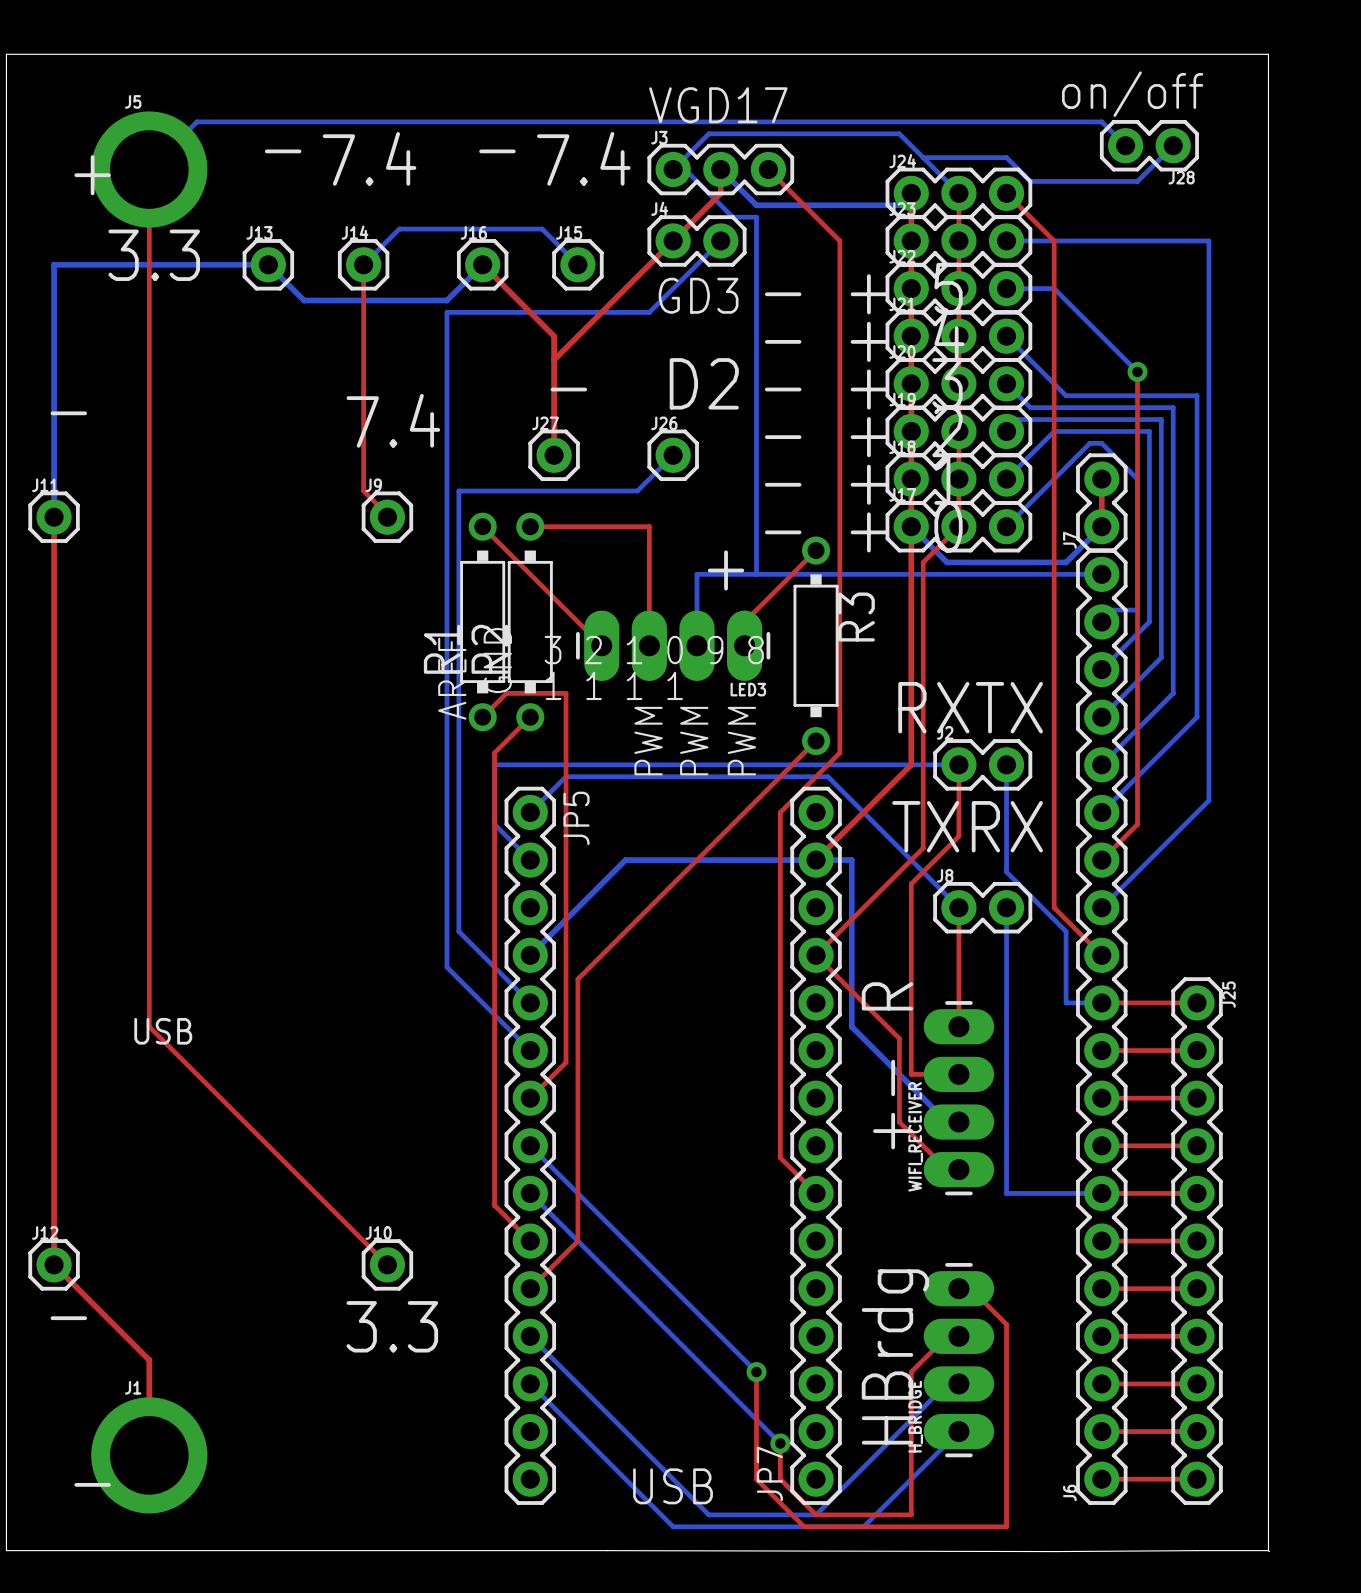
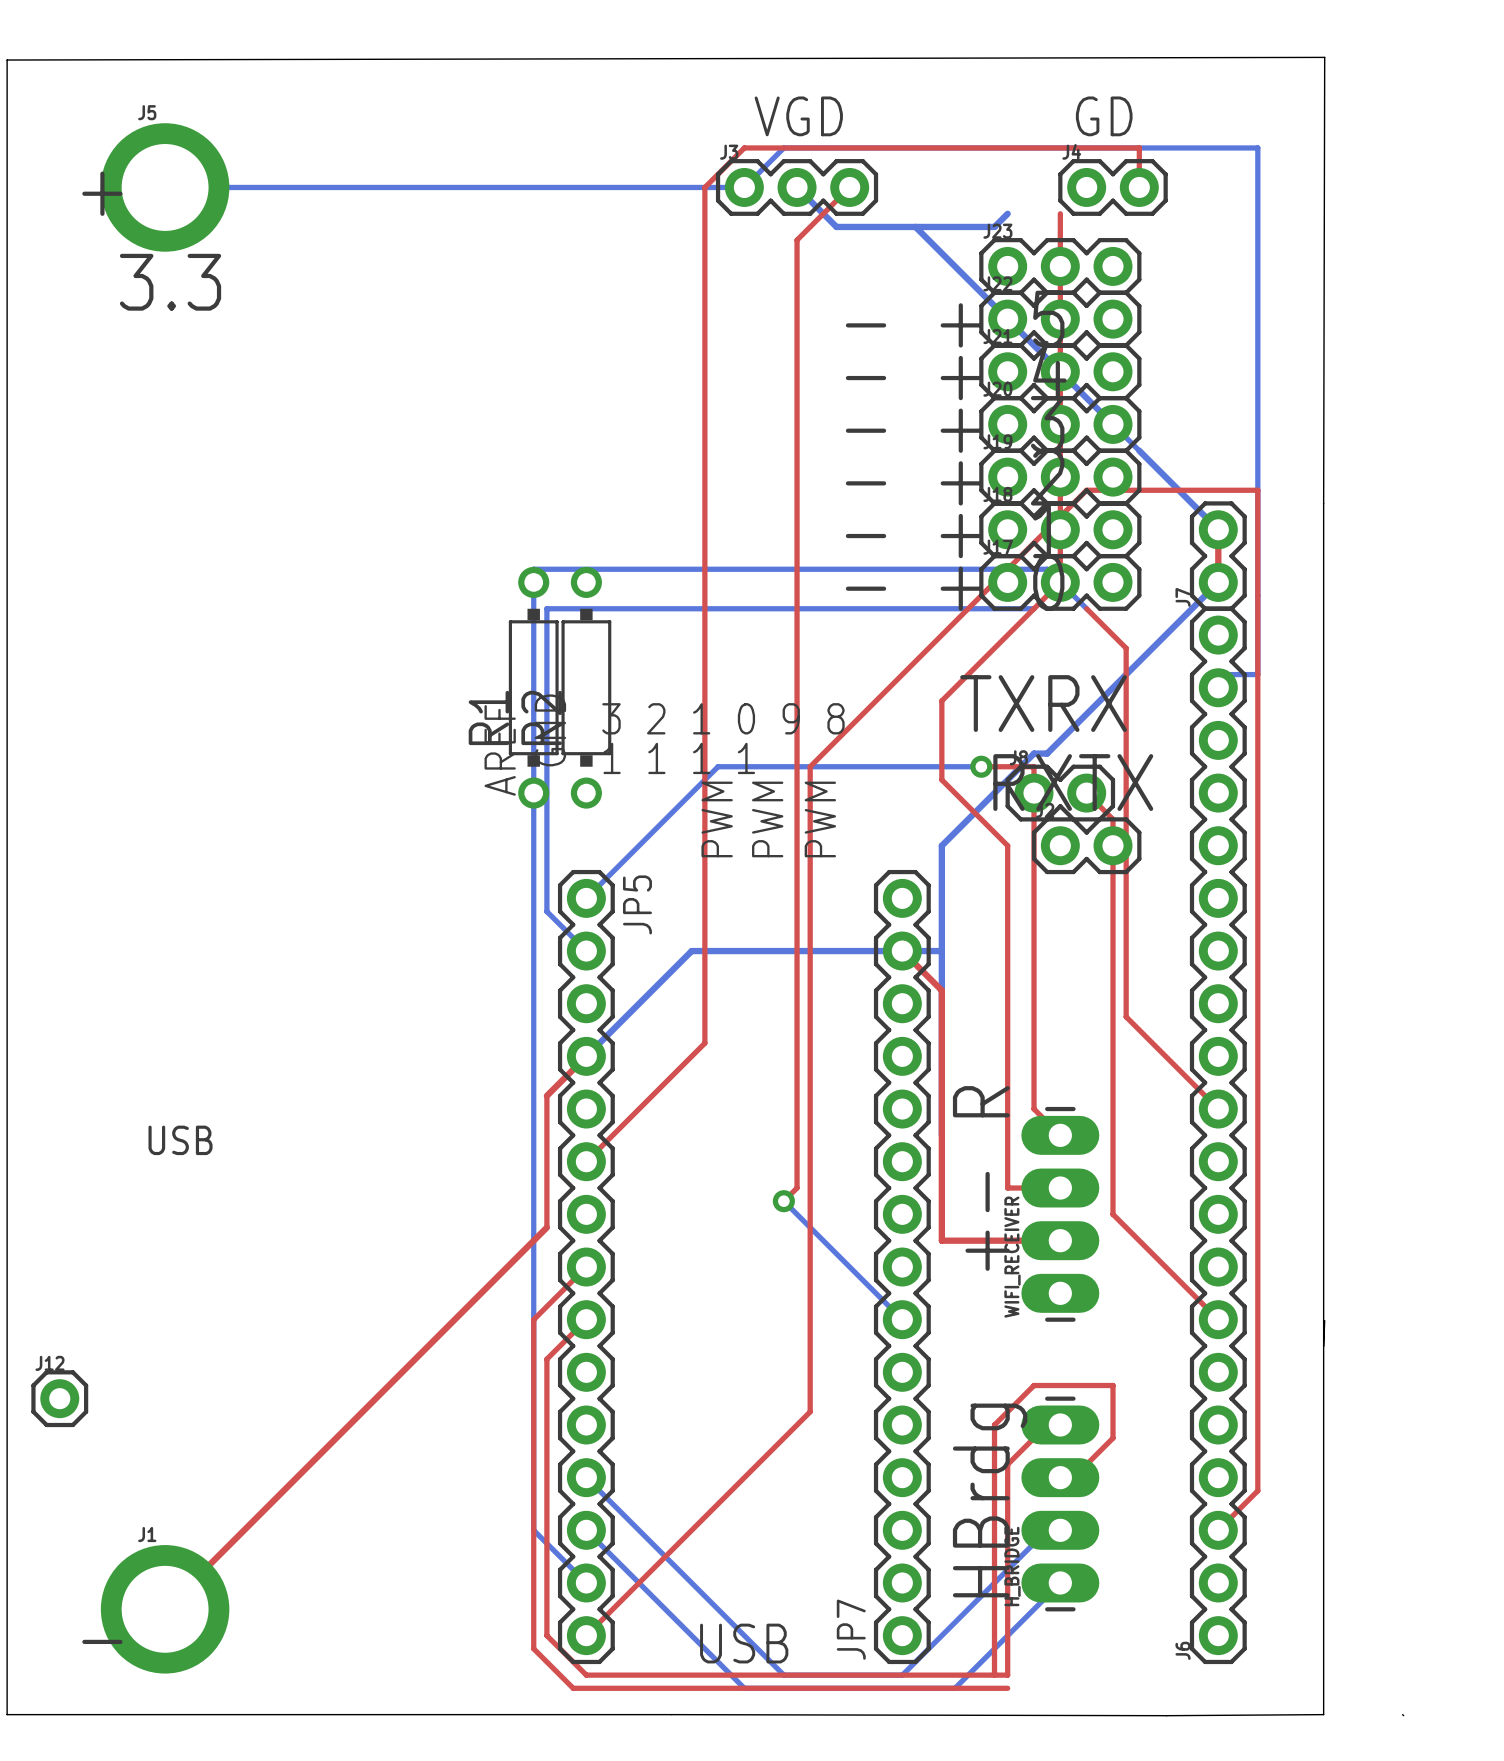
board edge: (6, 54) (1268, 54) (1268, 1550) (1197, 1550) -> (7, 60) (1324, 57) (1323, 1714)
text: on/off (1132, 94) -> none
text: VGD17 (718, 105) -> VGD (798, 116)
text: none -> GD (1104, 116)
bottom track: (899, 133) (958, 193) -> (994, 147) (1257, 147) (1257, 529)
bottom track: (1125, 145) (1101, 121) (196, 121) (149, 169) -> (744, 187) (165, 187)
J28: (1149, 145) -> none
bottom track: (1173, 145) (1137, 181) (1030, 181) (1006, 157) (923, 157) -> none
text: - (283, 151) -> none
text: - (497, 151) -> none
text: 7.4 (369, 158) -> none
text: 7.4 (583, 158) -> none
top track: (149, 169) (149, 1026) (387, 1264) -> none
bottom track: (673, 169) (685, 169) (732, 217) (756, 217) (756, 574) -> none
top track: (720, 169) (720, 193) (554, 360) -> none
top track: (768, 169) (839, 240) (839, 752) (780, 812) (780, 1157) (816, 1193) -> (849, 187) (797, 240) (797, 1188) (783, 1201)
top track: none -> (1139, 187) (1139, 147) (744, 147) (704, 187) (704, 1043) (586, 1161)
top track: (911, 193) (911, 764) (816, 860) -> (1060, 1240) (941, 1240) (941, 990) (902, 951)
J24: (958, 193) -> none
top track: (1006, 193) (1054, 240) (1054, 907) (1101, 955) -> none
bottom track: none -> (915, 226) (1113, 424)
J4 position: (696, 240) -> (1113, 187)
bottom track: (720, 240) (649, 312) (446, 312) (446, 967) (530, 1050) -> none
bottom track: (1006, 240) (1208, 240) (1208, 800) (1101, 907) -> none
J13: (268, 264) -> none
bottom track: (363, 264) (399, 229) (542, 229) (577, 264) -> none
top track: (363, 264) (363, 491) (387, 514) (387, 517) -> none
J14: (363, 264) -> none
bottom track: (482, 264) (446, 300) (304, 300) (268, 264) (54, 264) (54, 517) -> none
top track: (482, 264) (554, 336) (554, 455) -> none
J16: (482, 264) -> none
J15: (577, 264) -> none
bottom track: (1006, 288) (1054, 288) (1137, 371) -> none
text: GD3 (698, 295) -> none
bottom track: (1006, 336) (1066, 395) (1197, 395) (1197, 717) (1101, 812) -> none
top track: (1137, 371) (1137, 443) -> (586, 1635) (810, 1411) (810, 766) (1086, 490) (1257, 490)
via: (1137, 371) -> none
text: D2 (704, 383) -> none
text: - (568, 389) -> none
bottom track: (1030, 407) (1173, 407) (1173, 693) (1101, 764) -> (1139, 450) (1218, 529)
text: - (68, 413) -> none
text: 7.4 (393, 420) -> none
bottom track: (1006, 431) (1018, 419) (1161, 419) (1161, 657) (1101, 717) -> none
J27: (554, 455) -> none
bottom track: (673, 455) (637, 491) (458, 491) (458, 931) (530, 1002) -> none
J26: (673, 455) -> none
bottom track: (1006, 479) (1054, 431) (1149, 431) (1149, 621) (1101, 669) -> none
bottom track: (1137, 479) (1101, 443) (1089, 443) (1006, 526) -> none
top track: (54, 517) (54, 1264) (149, 1360) (149, 1455) -> none
J11: (54, 517) -> none
J9: (387, 517) -> none
top track: (482, 526) (601, 645) -> none
top track: (530, 526) (649, 526) (649, 645) -> none
bottom track: (911, 526) (947, 562) (1066, 562) -> (941, 951) (941, 845) (1034, 753) (1047, 753) (1178, 621)
top track: (816, 550) (744, 621) (744, 645) -> none
bottom track: none -> (1086, 608) (1047, 569) (533, 569) (533, 1530) (586, 1582)
top track: (923, 562) (923, 848) (816, 955) (899, 1038) (899, 1122) (947, 1169) (958, 1169) -> none
text: + (726, 570) -> none
bottom track: (1101, 574) (696, 574) (696, 645) -> none
LED3: (673, 645) -> none
R3: (816, 645) -> none
via: none -> (981, 766)
top track: (482, 717) (506, 693) (566, 693) (566, 1062) (530, 1098) -> none
top track: (530, 717) (494, 752) (494, 991) -> (586, 1056) (546, 1095)
top track: (816, 741) (577, 979) (577, 1241) (530, 1288) -> none
bottom track: (494, 764) (958, 764) -> (546, 845) (546, 608) (1034, 608)
top track: (958, 764) (958, 836) (911, 883) -> (1020, 621) (941, 700) (941, 779) (1007, 845) (1007, 977)
bottom track: (1006, 764) (1006, 871) (1066, 931) (1066, 1002) (1101, 1002) -> none
bottom track: (566, 776) (827, 776) (958, 907) -> (625, 858) (718, 766) (981, 766)
top track: (1137, 824) (1101, 860) -> (1257, 911) (1257, 1490) (1218, 1530)
text position: TXRX (967, 826) -> TXRX (1043, 703)
top track: (958, 907) (958, 1026) -> (981, 766) (1034, 766) (1034, 1109) (1060, 1135)
J8 position: (982, 907) -> (1060, 793)
bottom track: (1006, 907) (1006, 1193) (1101, 1193) -> none
top track: (1101, 1002) (1197, 1002) -> (1218, 1109) (1126, 1016) (1126, 648) (1086, 608)
bottom track: (851, 1026) (935, 1110) (947, 1110) (958, 1122) -> none
top track: (1101, 1050) (1197, 1050) -> none
bottom track: none -> (783, 1201) (902, 1319)
via: none -> (783, 1201)
top track: (1101, 1098) (1197, 1098) -> none
top track: (494, 1110) (494, 1205) (530, 1241) -> (546, 1227) (165, 1609)
bottom track: (530, 1145) (756, 1372) -> none
top track: (1101, 1145) (1197, 1145) -> none
bottom track: (530, 1193) (780, 1443) -> none
top track: (1101, 1193) (1197, 1193) -> (1218, 1319) (1113, 1214) (1113, 819) (1086, 793)
board edge: none -> (1324, 1320) (1323, 1346)
top track: (1101, 1241) (1197, 1241) -> none
J25: (1197, 1241) -> none
J10: (387, 1264) -> none
top track: (958, 1288) (970, 1288) (1006, 1324) (1006, 1526) (911, 1526) -> none
top track: (1101, 1288) (1197, 1288) -> none
text: - (68, 1318) -> none
text: 3.3 (392, 1326) -> none
top track: (958, 1336) (947, 1336) (911, 1372) -> (1060, 1425) (1047, 1425) (1007, 1464) (1007, 1517)
top track: none -> (1060, 1477) (1073, 1477) (1113, 1438) (1113, 1385) (1034, 1385) (994, 1425) (994, 1675)
top track: (1101, 1336) (1197, 1336) -> none
top track: (756, 1372) (756, 1479) (804, 1526) -> (586, 1267) (533, 1319) (533, 1648) (573, 1688) (889, 1688)
via: (756, 1372) -> none
top track: (1101, 1383) (1197, 1383) -> none
top track: (1101, 1431) (1197, 1431) -> none
top track: (780, 1443) (780, 1479) (816, 1514) -> (586, 1319) (546, 1359) (546, 1635) (586, 1675) (902, 1675)
via: (780, 1443) -> none
top track: (1101, 1479) (1197, 1479) -> none

